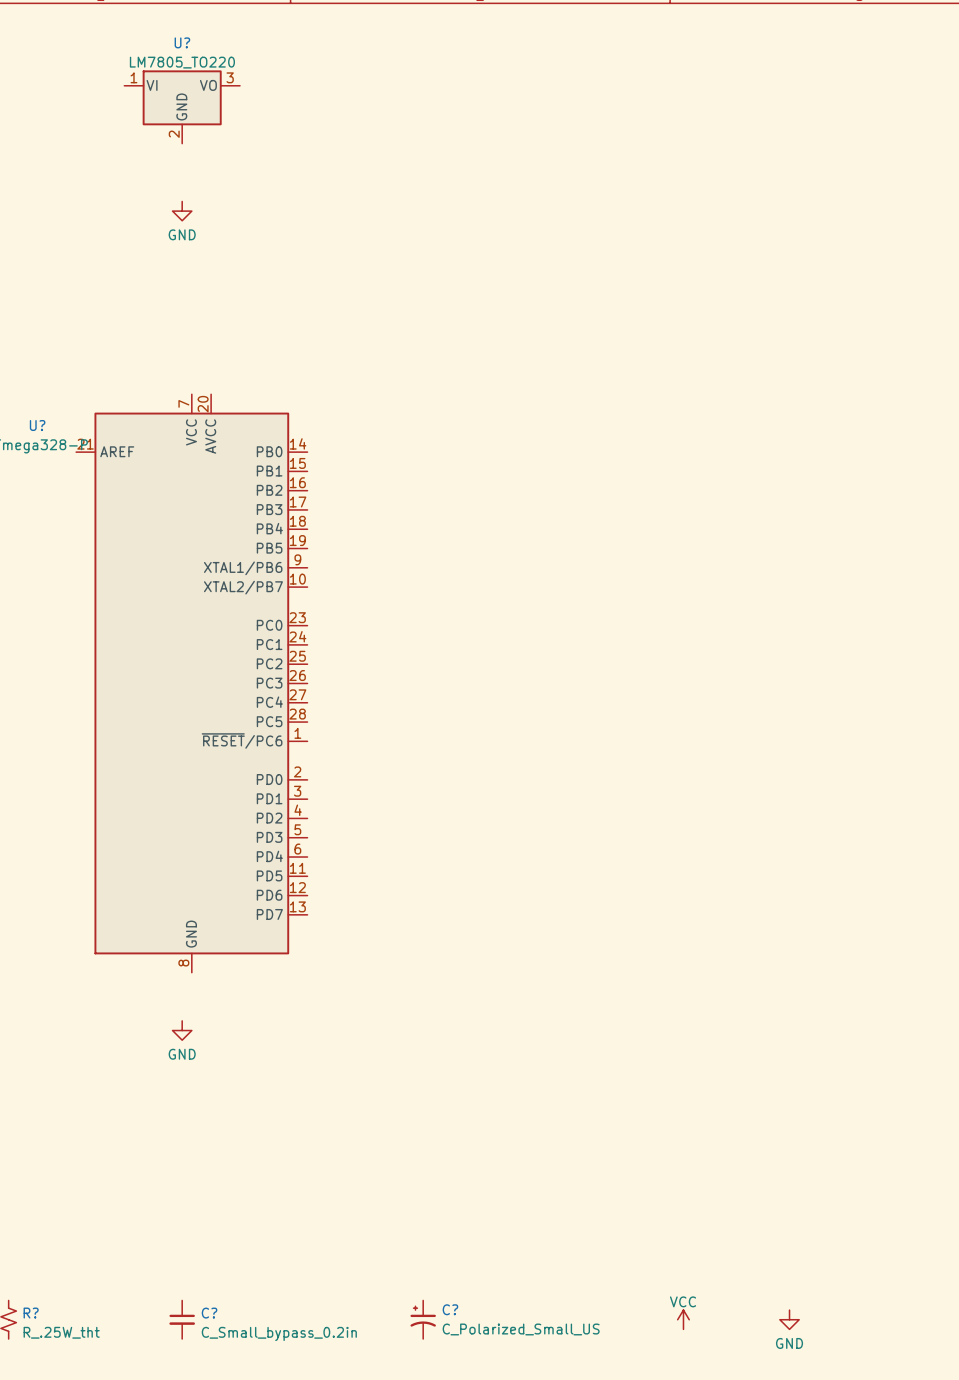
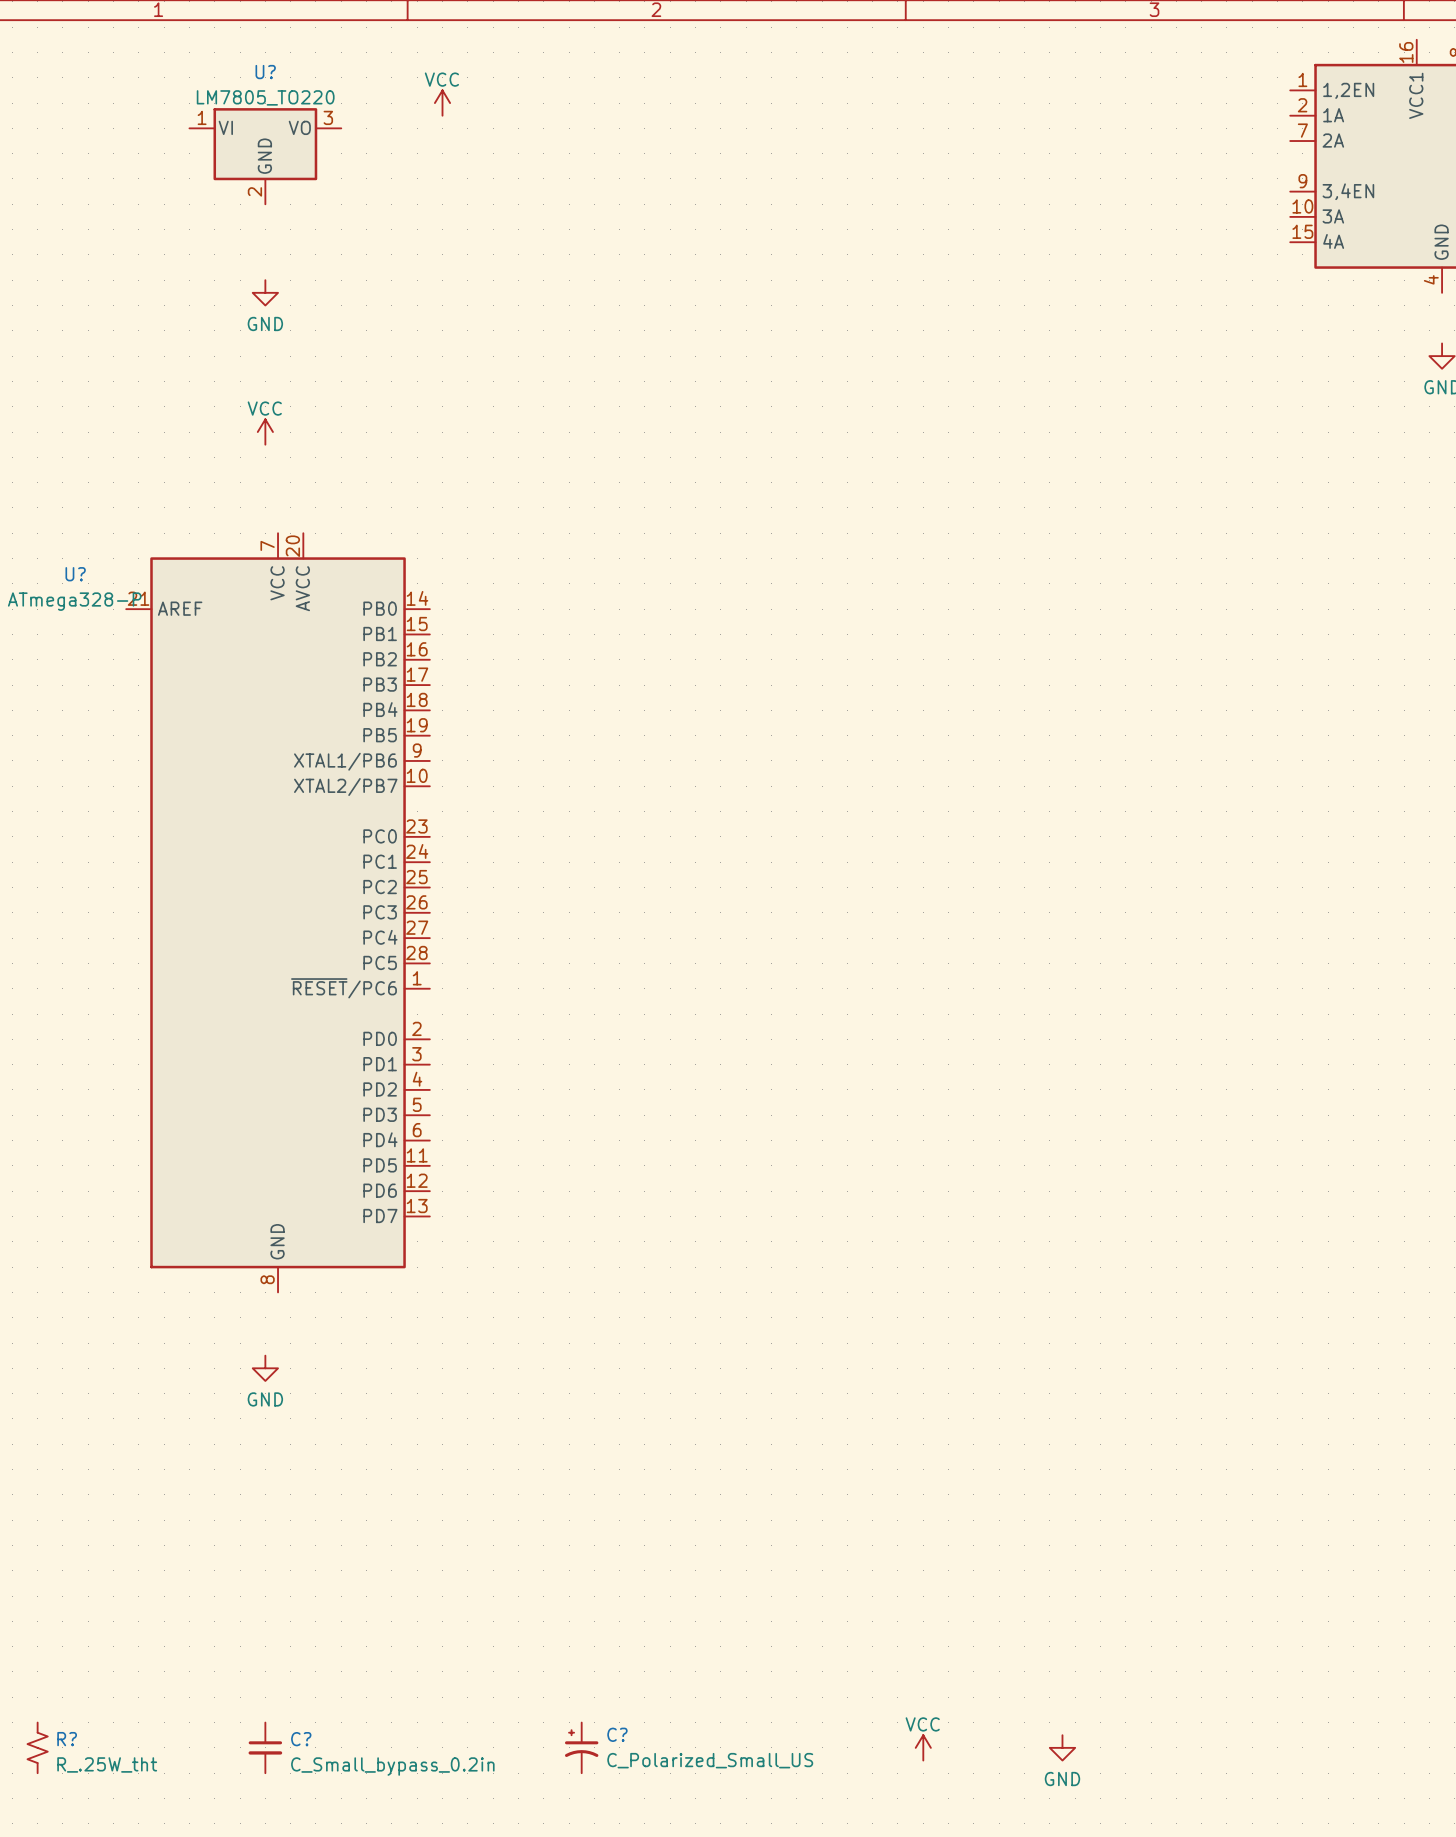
power symbol: none -> VCC (442, 103)
power symbol: none -> VCC (265, 432)

